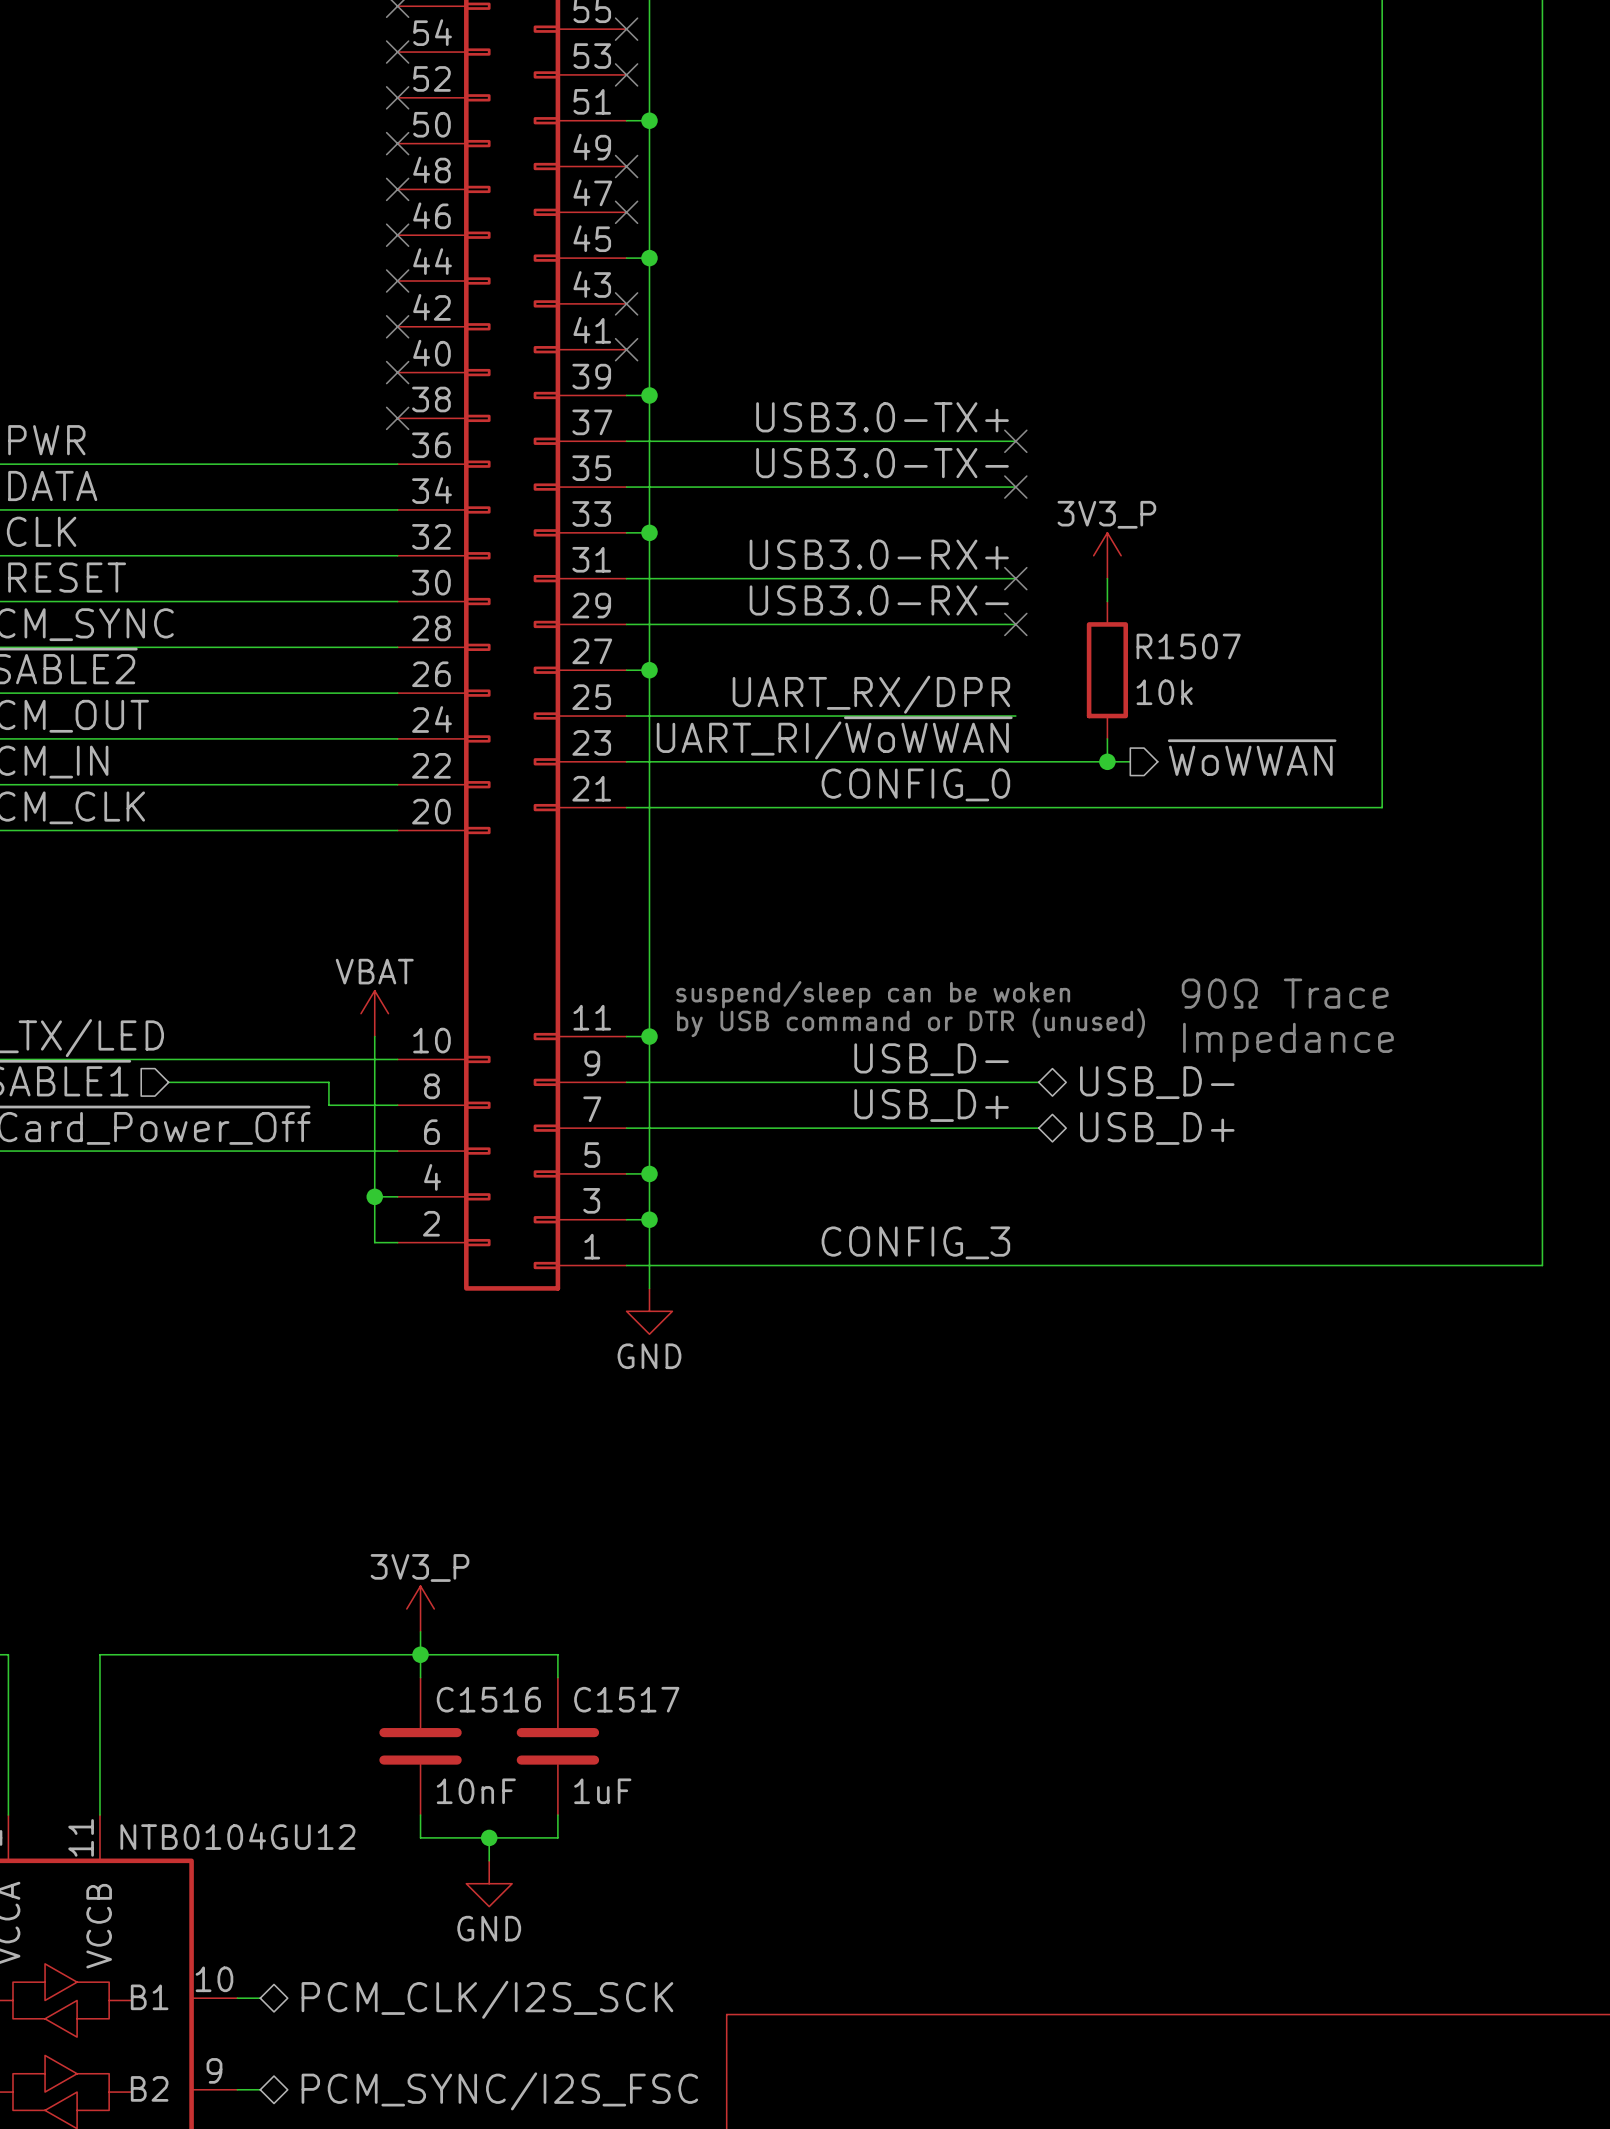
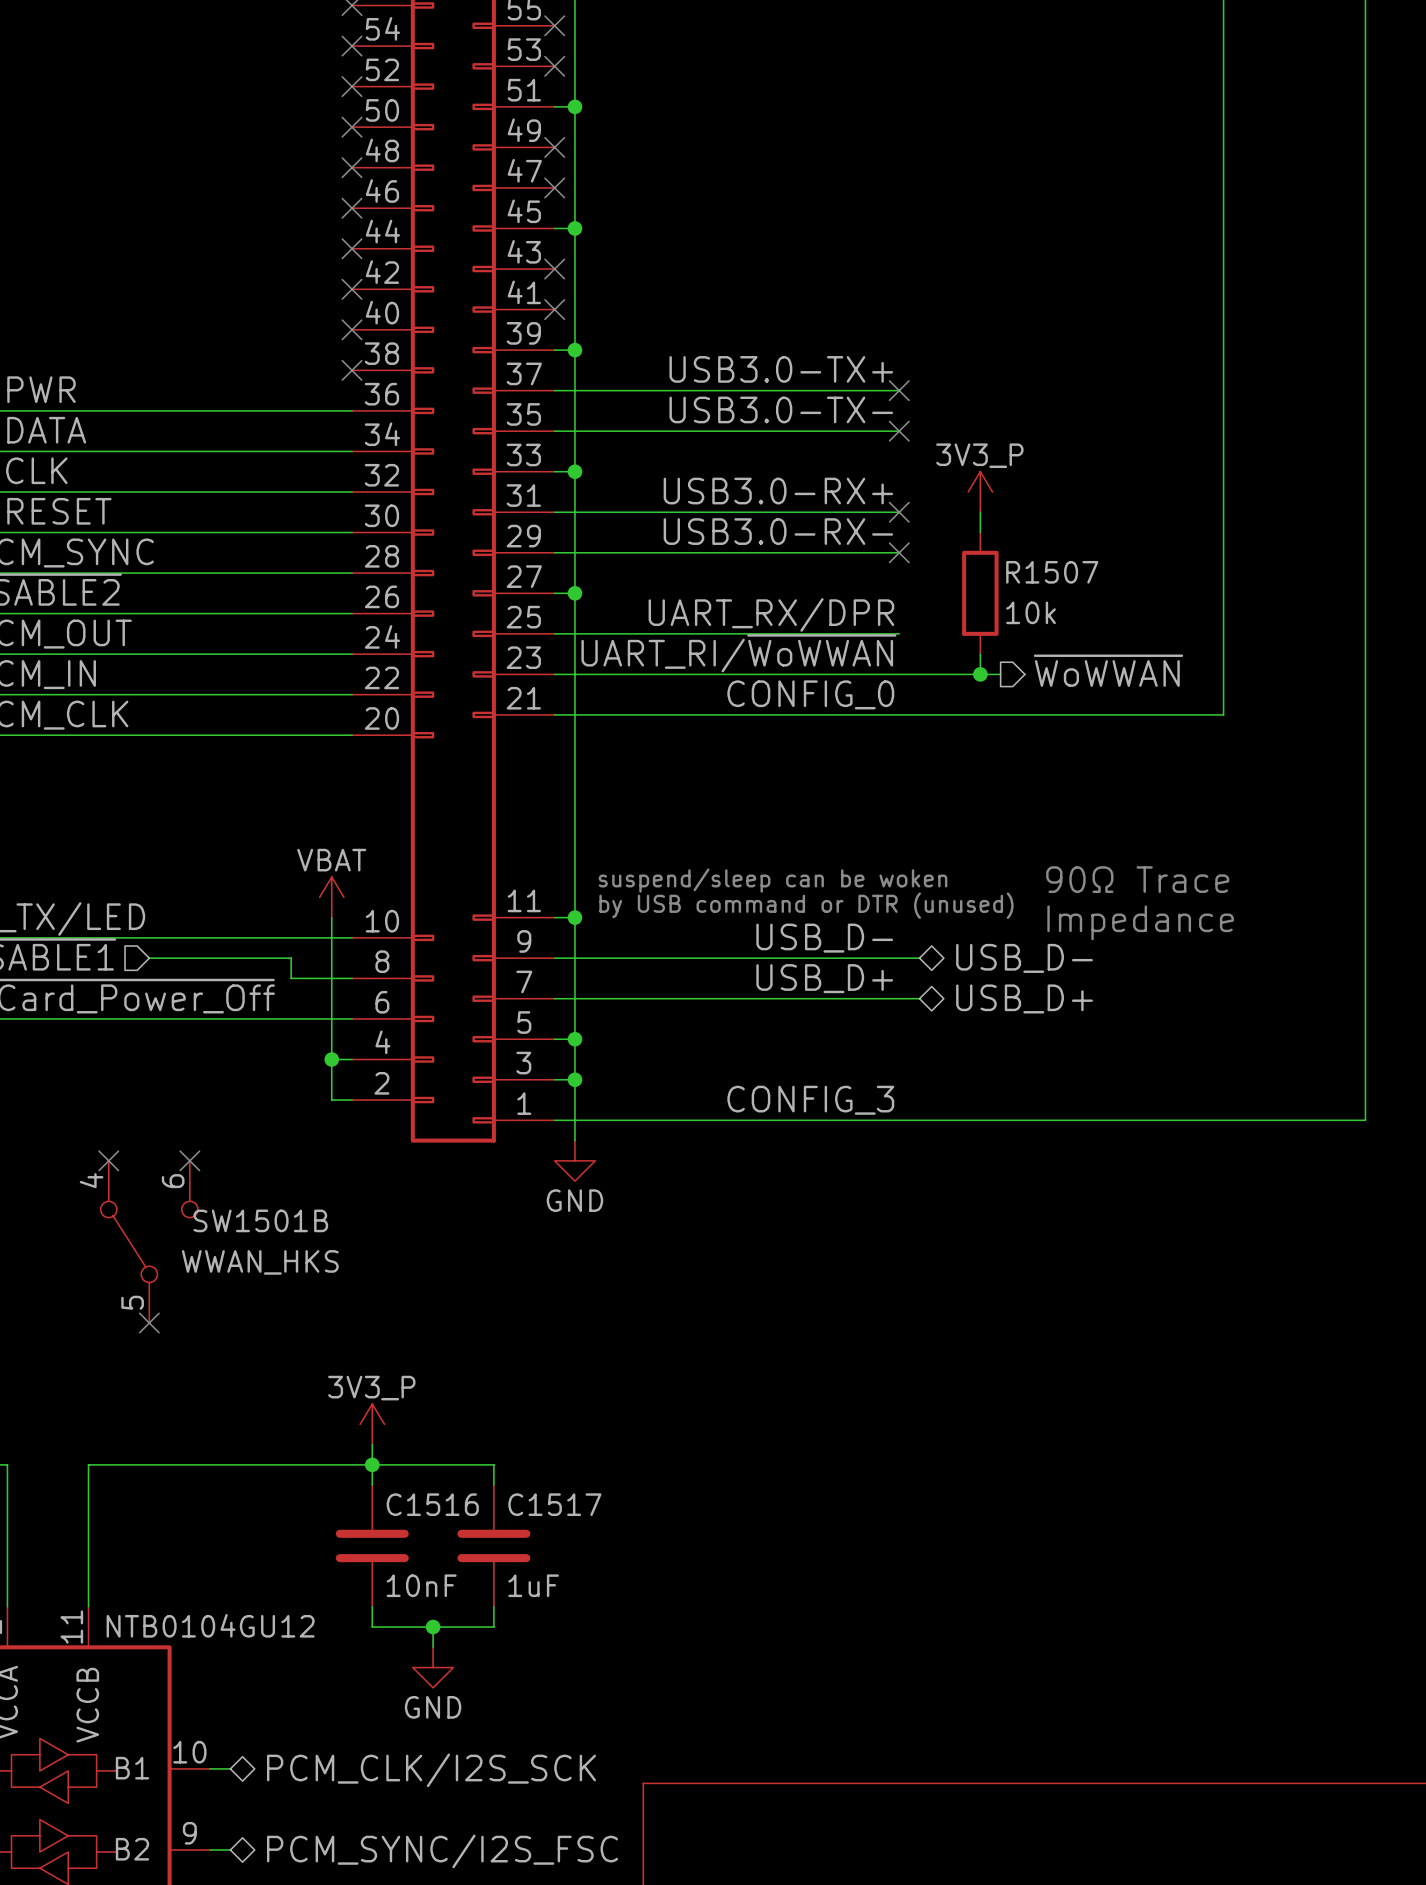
no-connect mark: none -> (108, 1160)
no-connect mark: none -> (189, 1160)
SW1501B: none -> WWAN_HKS (149, 1241)
no-connect mark: none -> (149, 1323)

